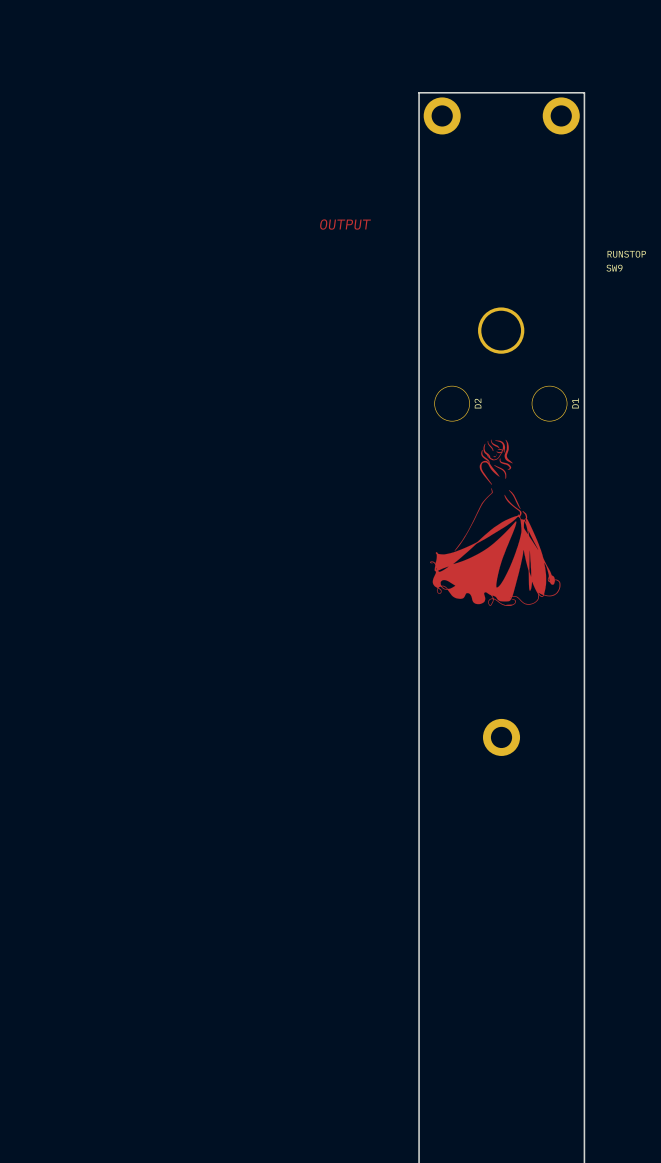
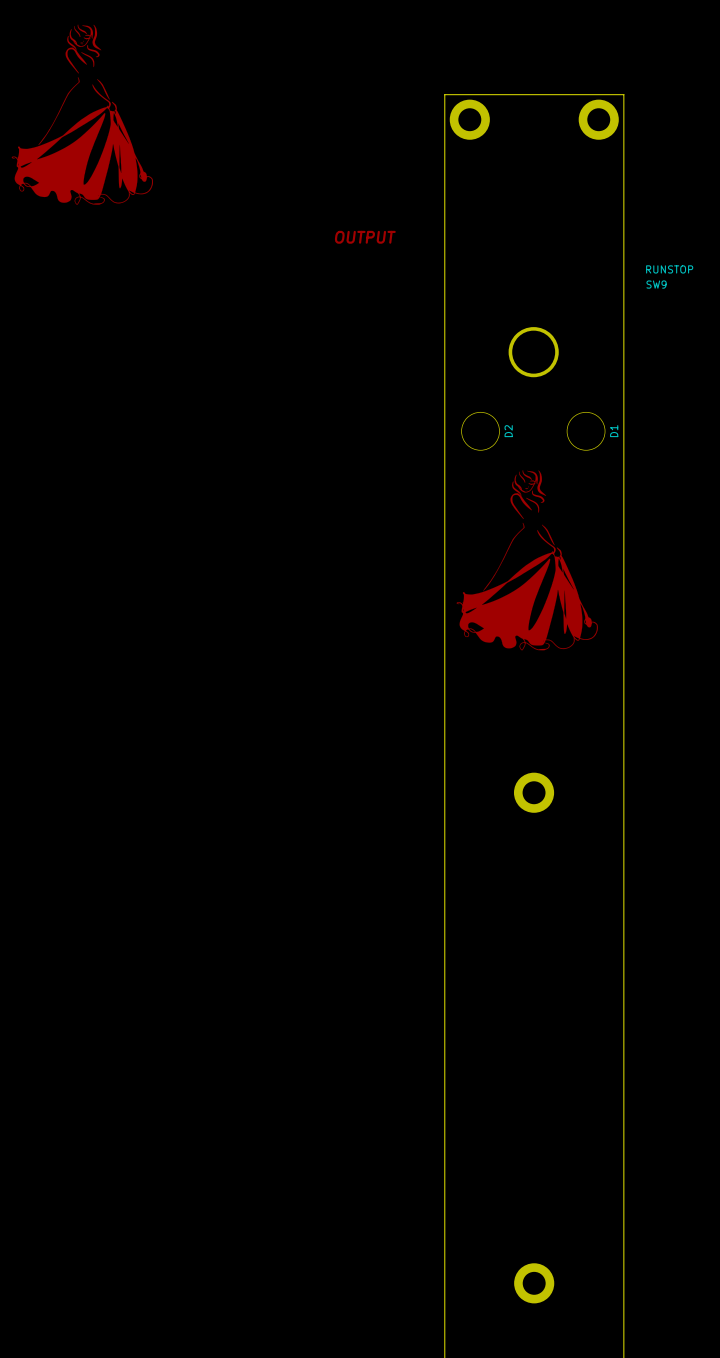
drawing: none -> [11, 24, 153, 205]

